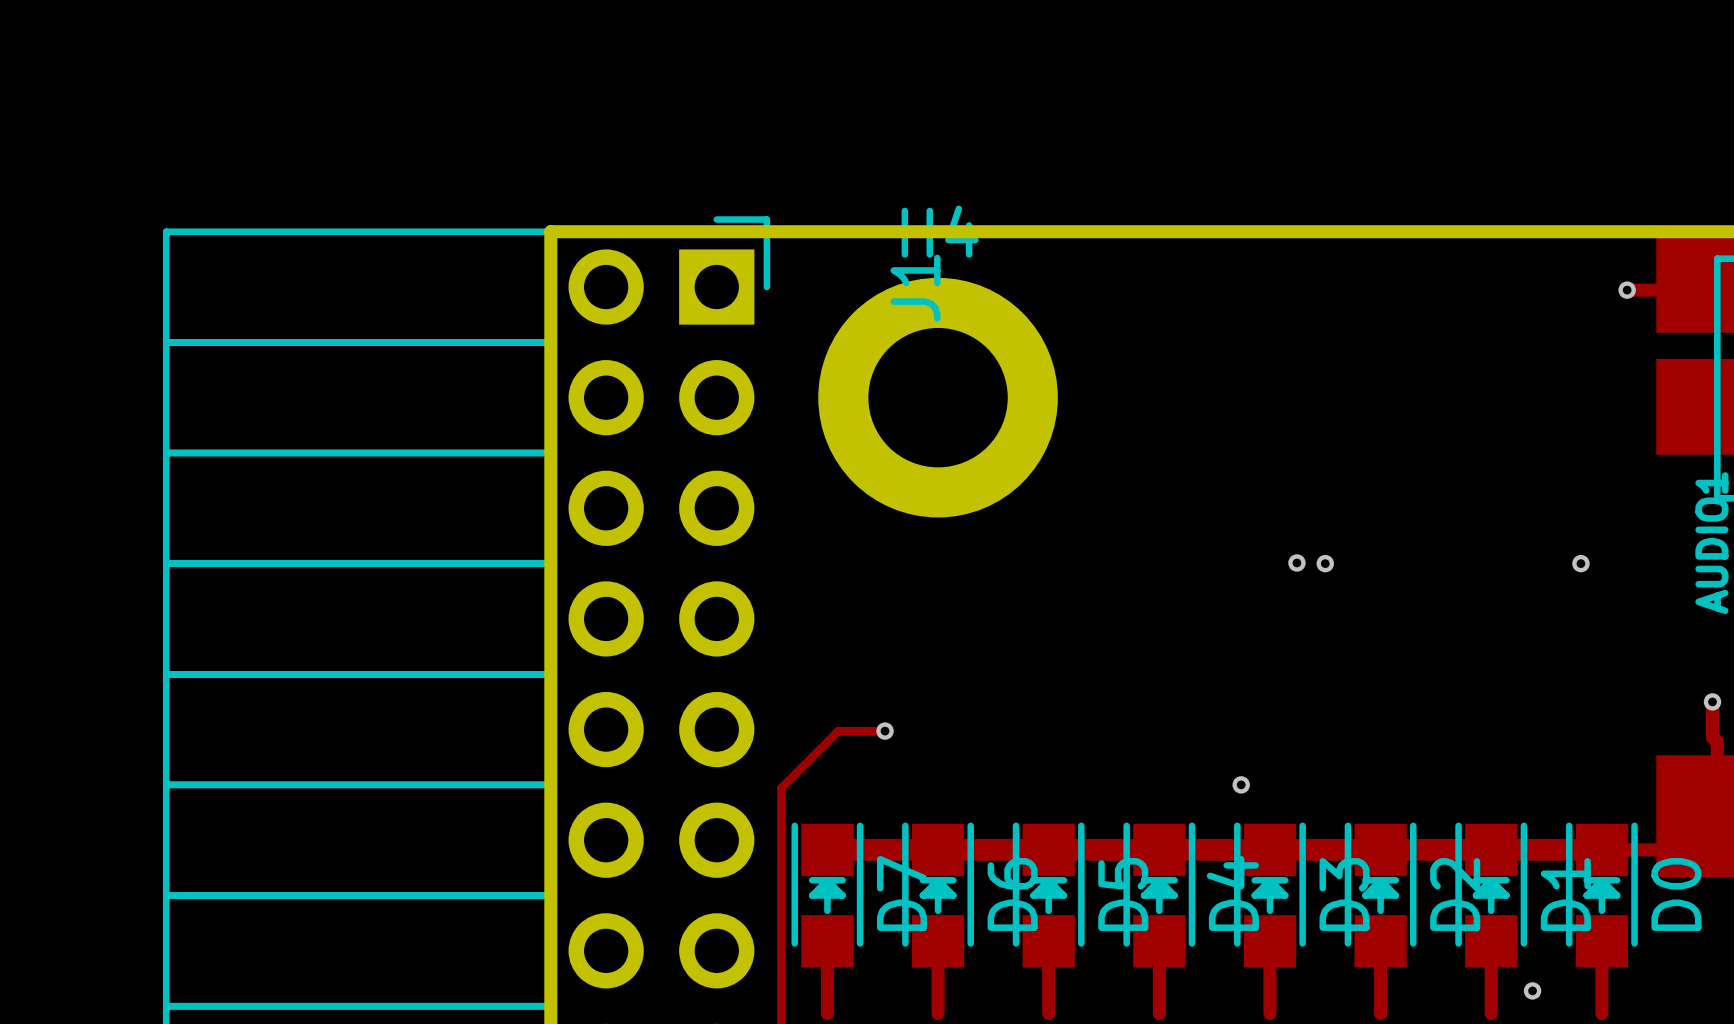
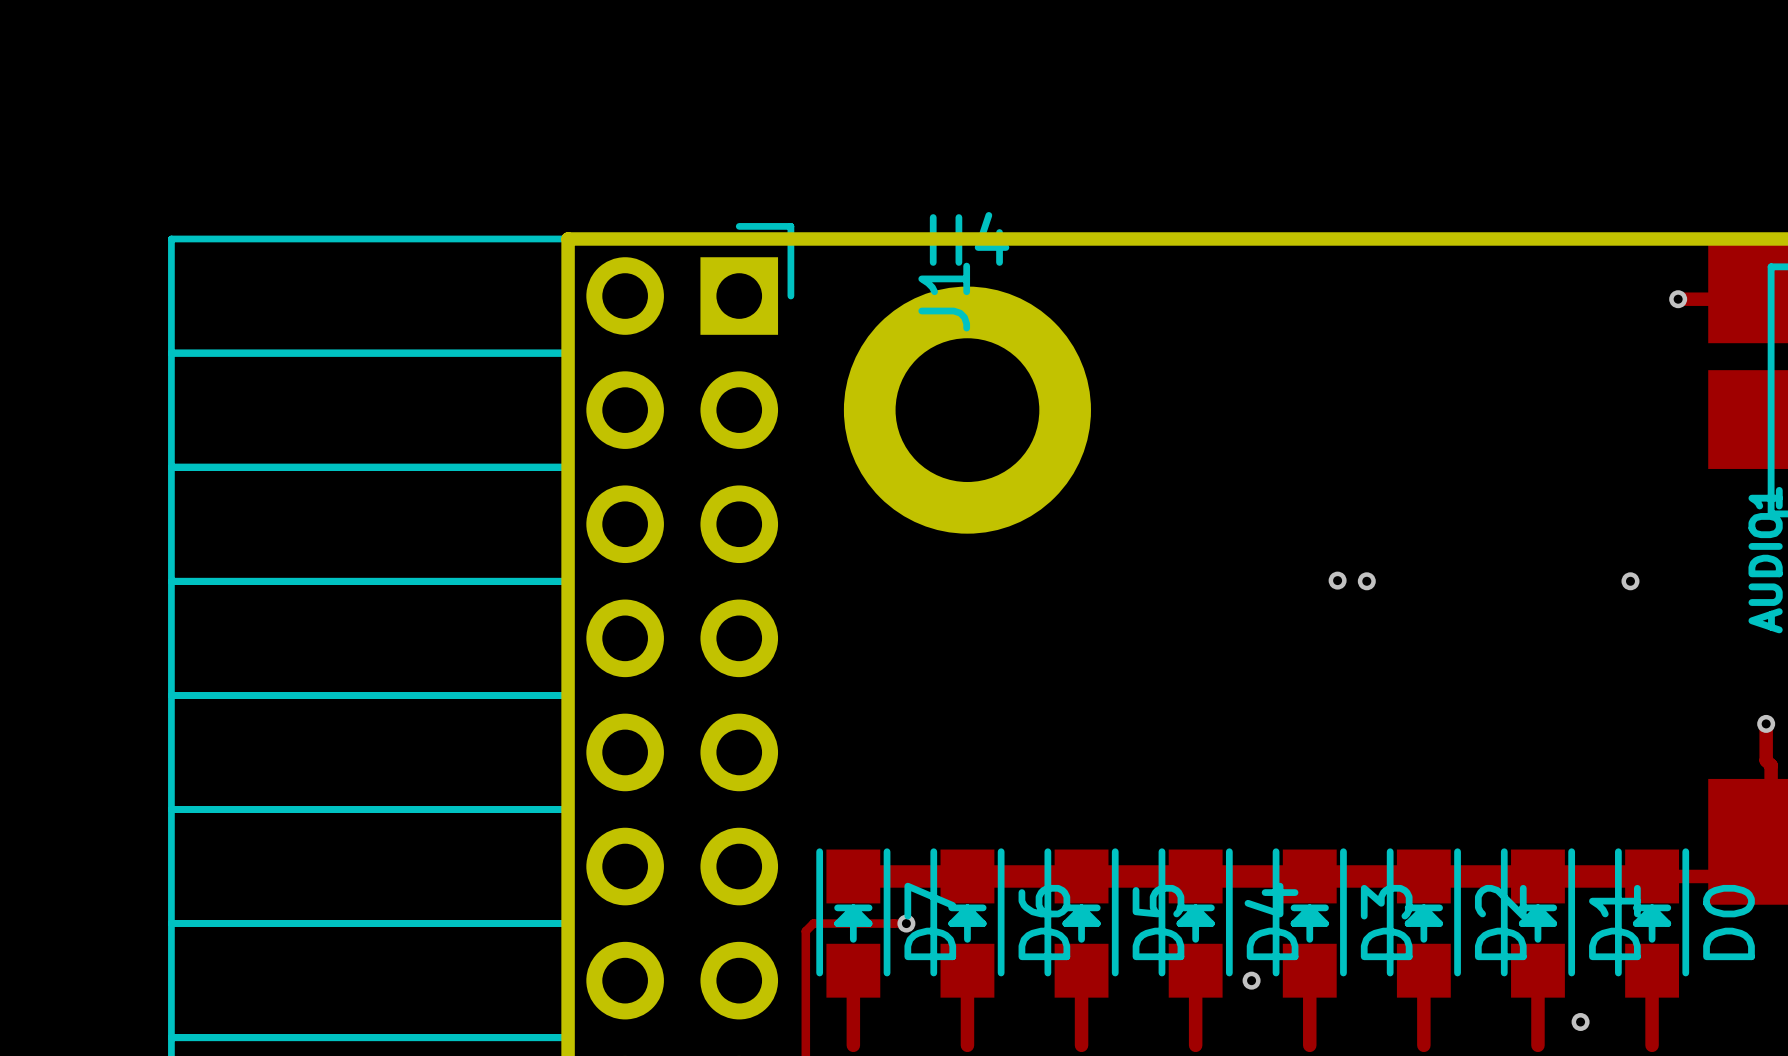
track: (885, 731) (838, 731) (781, 788) (781, 902) -> (906, 923) (813, 923) (805, 931)
via position: (885, 731) -> (906, 923)
via position: (1241, 784) -> (1251, 980)

